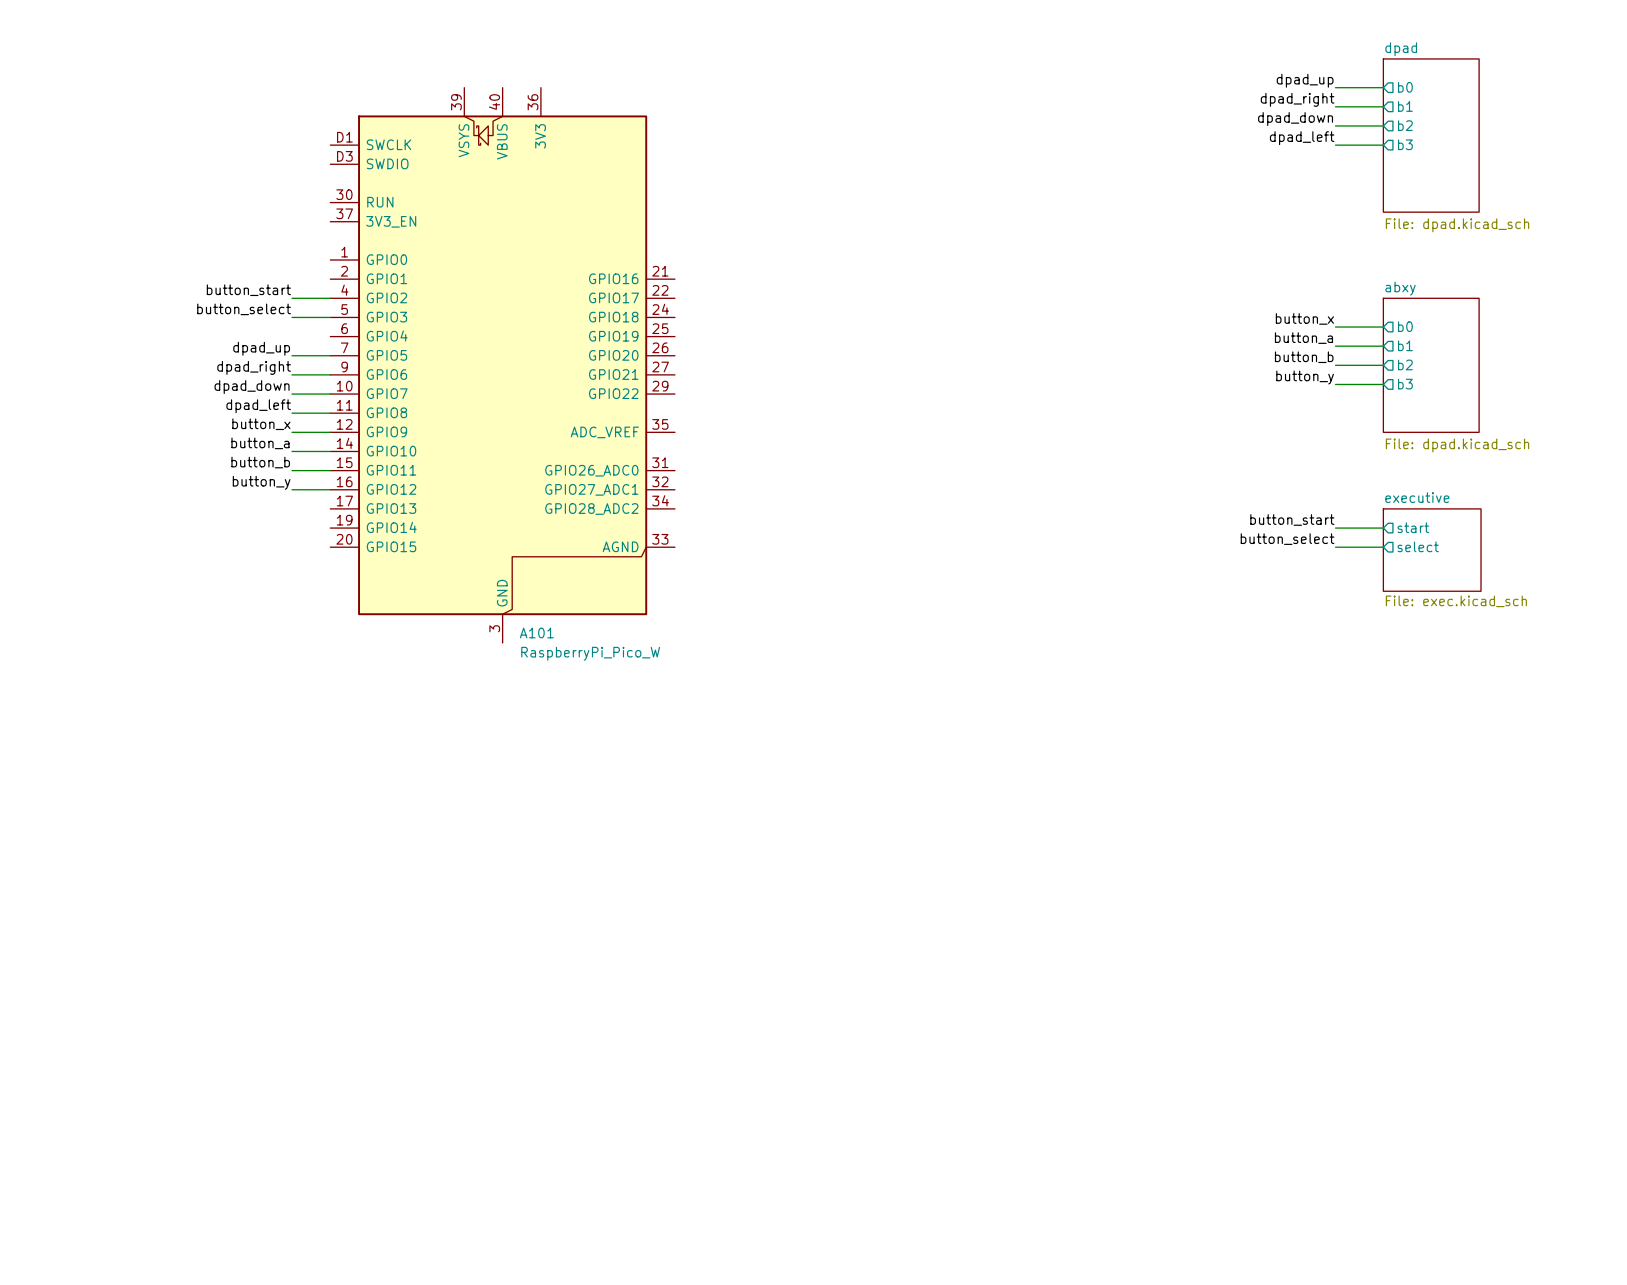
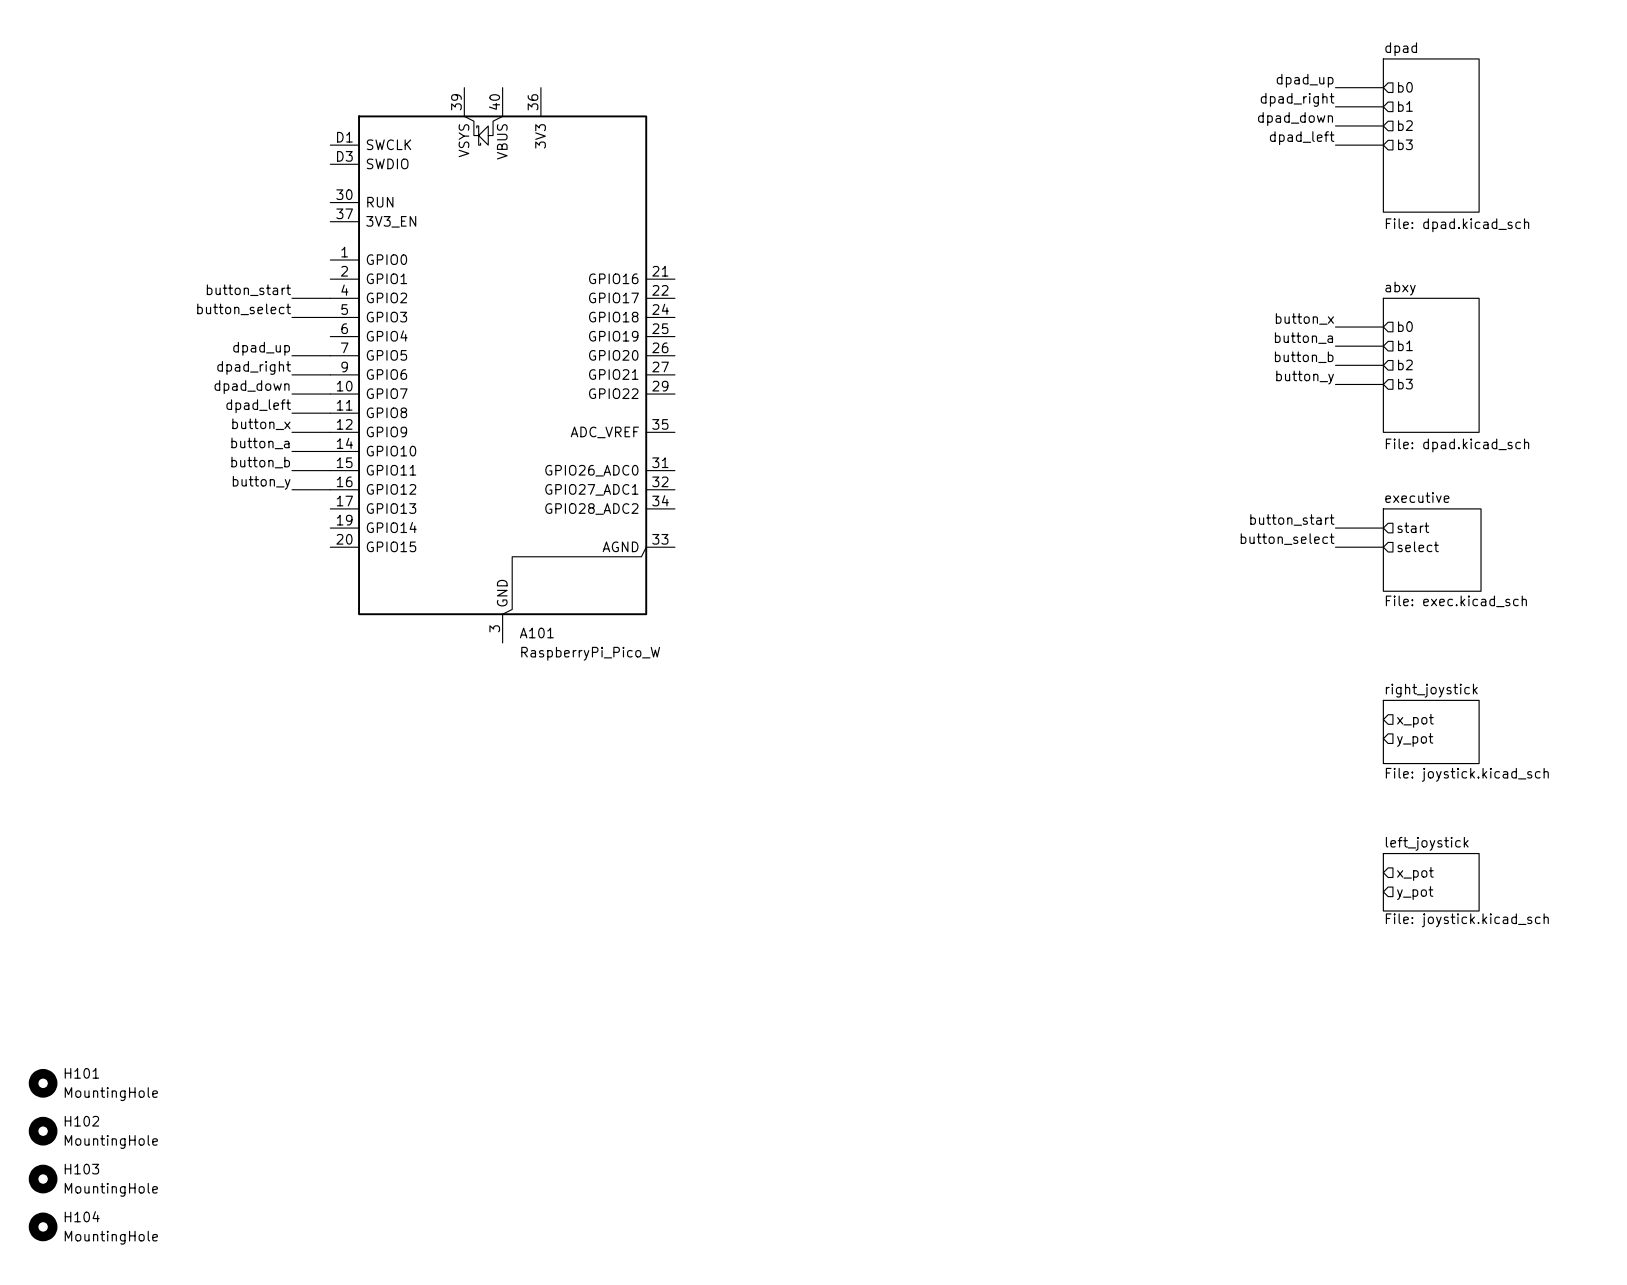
sheet pin: none -> x_pot (1415, 720)
sheet right_joystick: none -> File: joystick.kicad_sch (1431, 731)
sheet pin: none -> y_pot (1415, 739)
sheet pin: none -> x_pot (1415, 873)
sheet left_joystick: none -> File: joystick.kicad_sch (1431, 882)
sheet pin: none -> y_pot (1415, 893)
H101: none -> MountingHole (43, 1083)
H102: none -> MountingHole (43, 1131)
H103: none -> MountingHole (43, 1179)
H104: none -> MountingHole (43, 1226)

